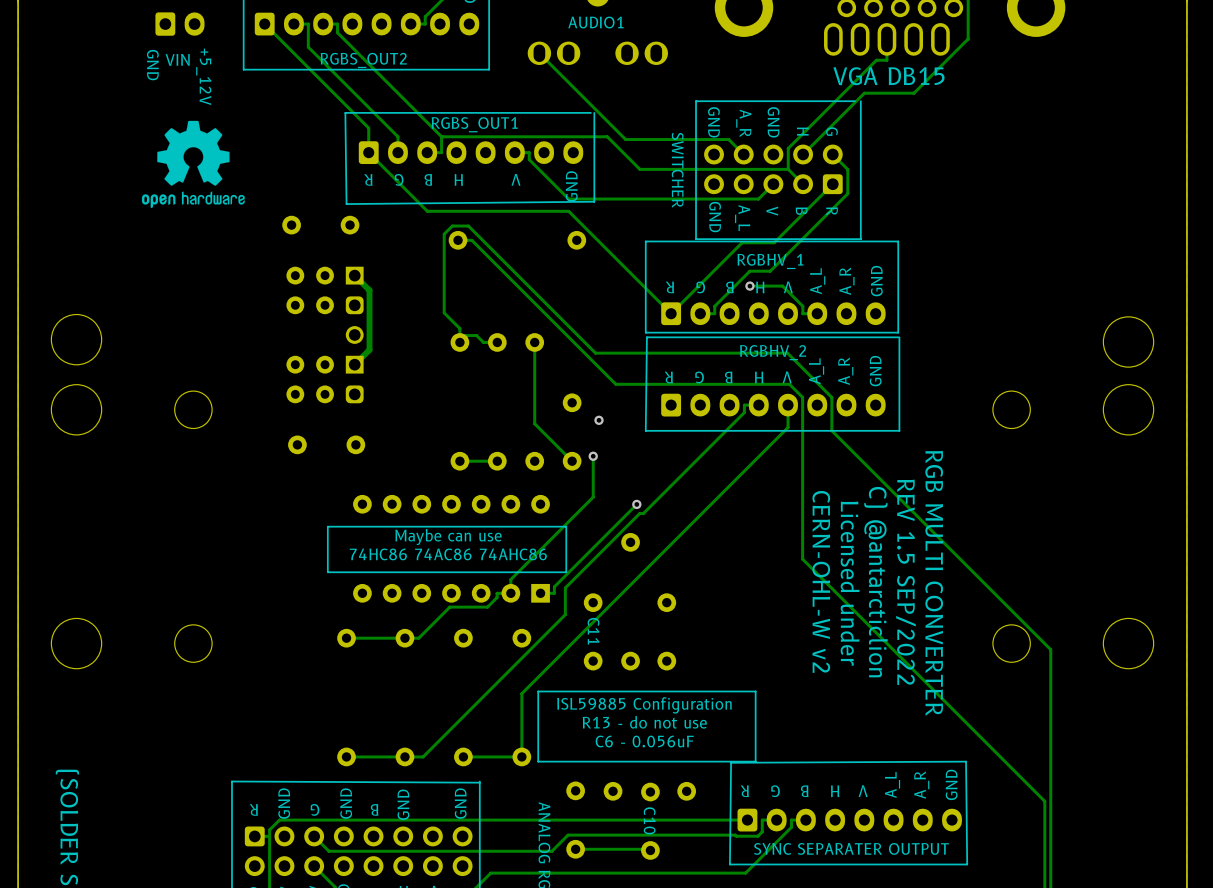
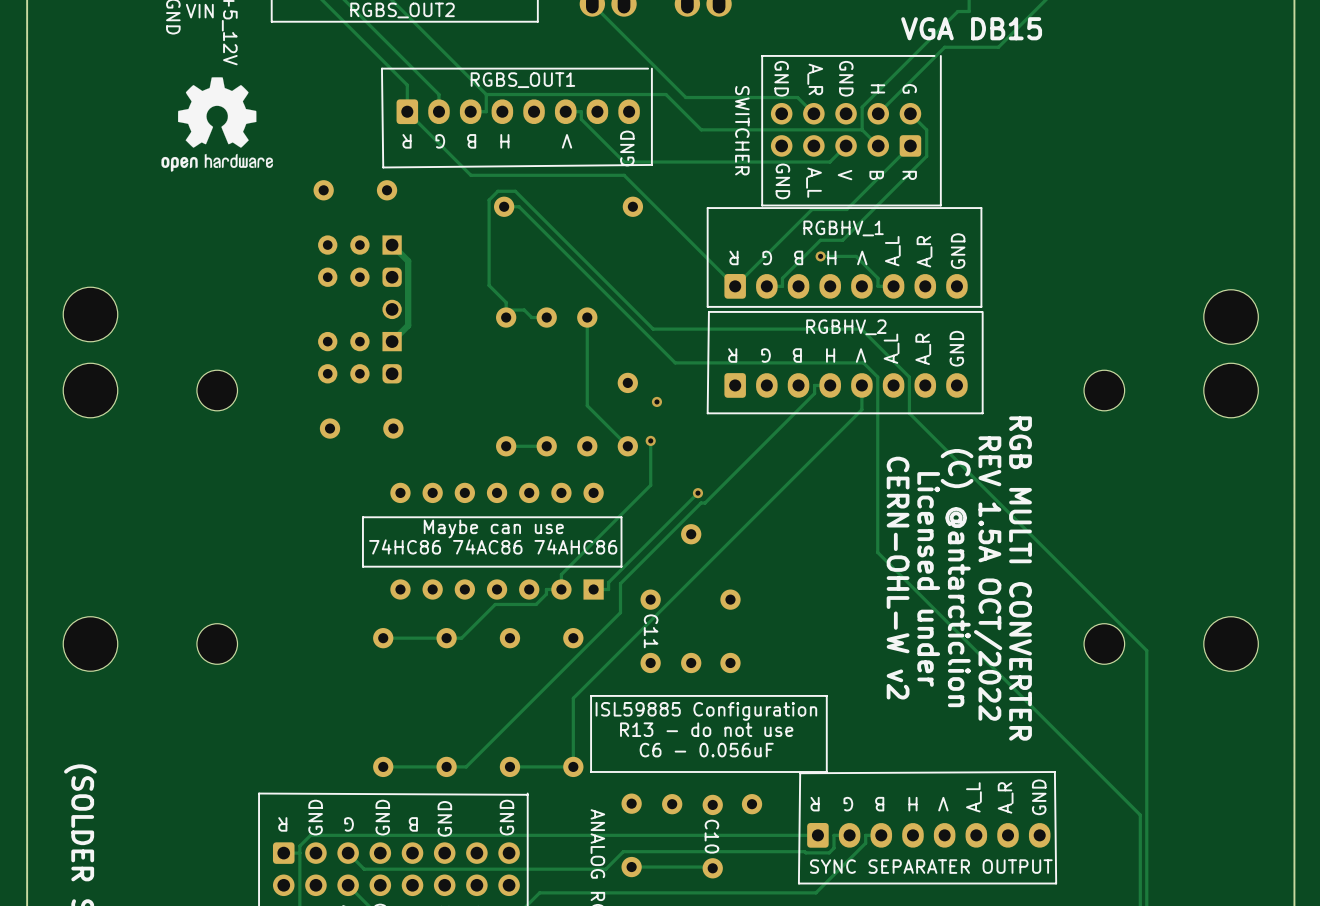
text: C) @antarcticlion (876, 582) -> (C) @antarcticlion (957, 578)
text: REV 1.5 SEP/2022 (905, 582) -> REV 1.5A OCT/2022 (988, 578)

